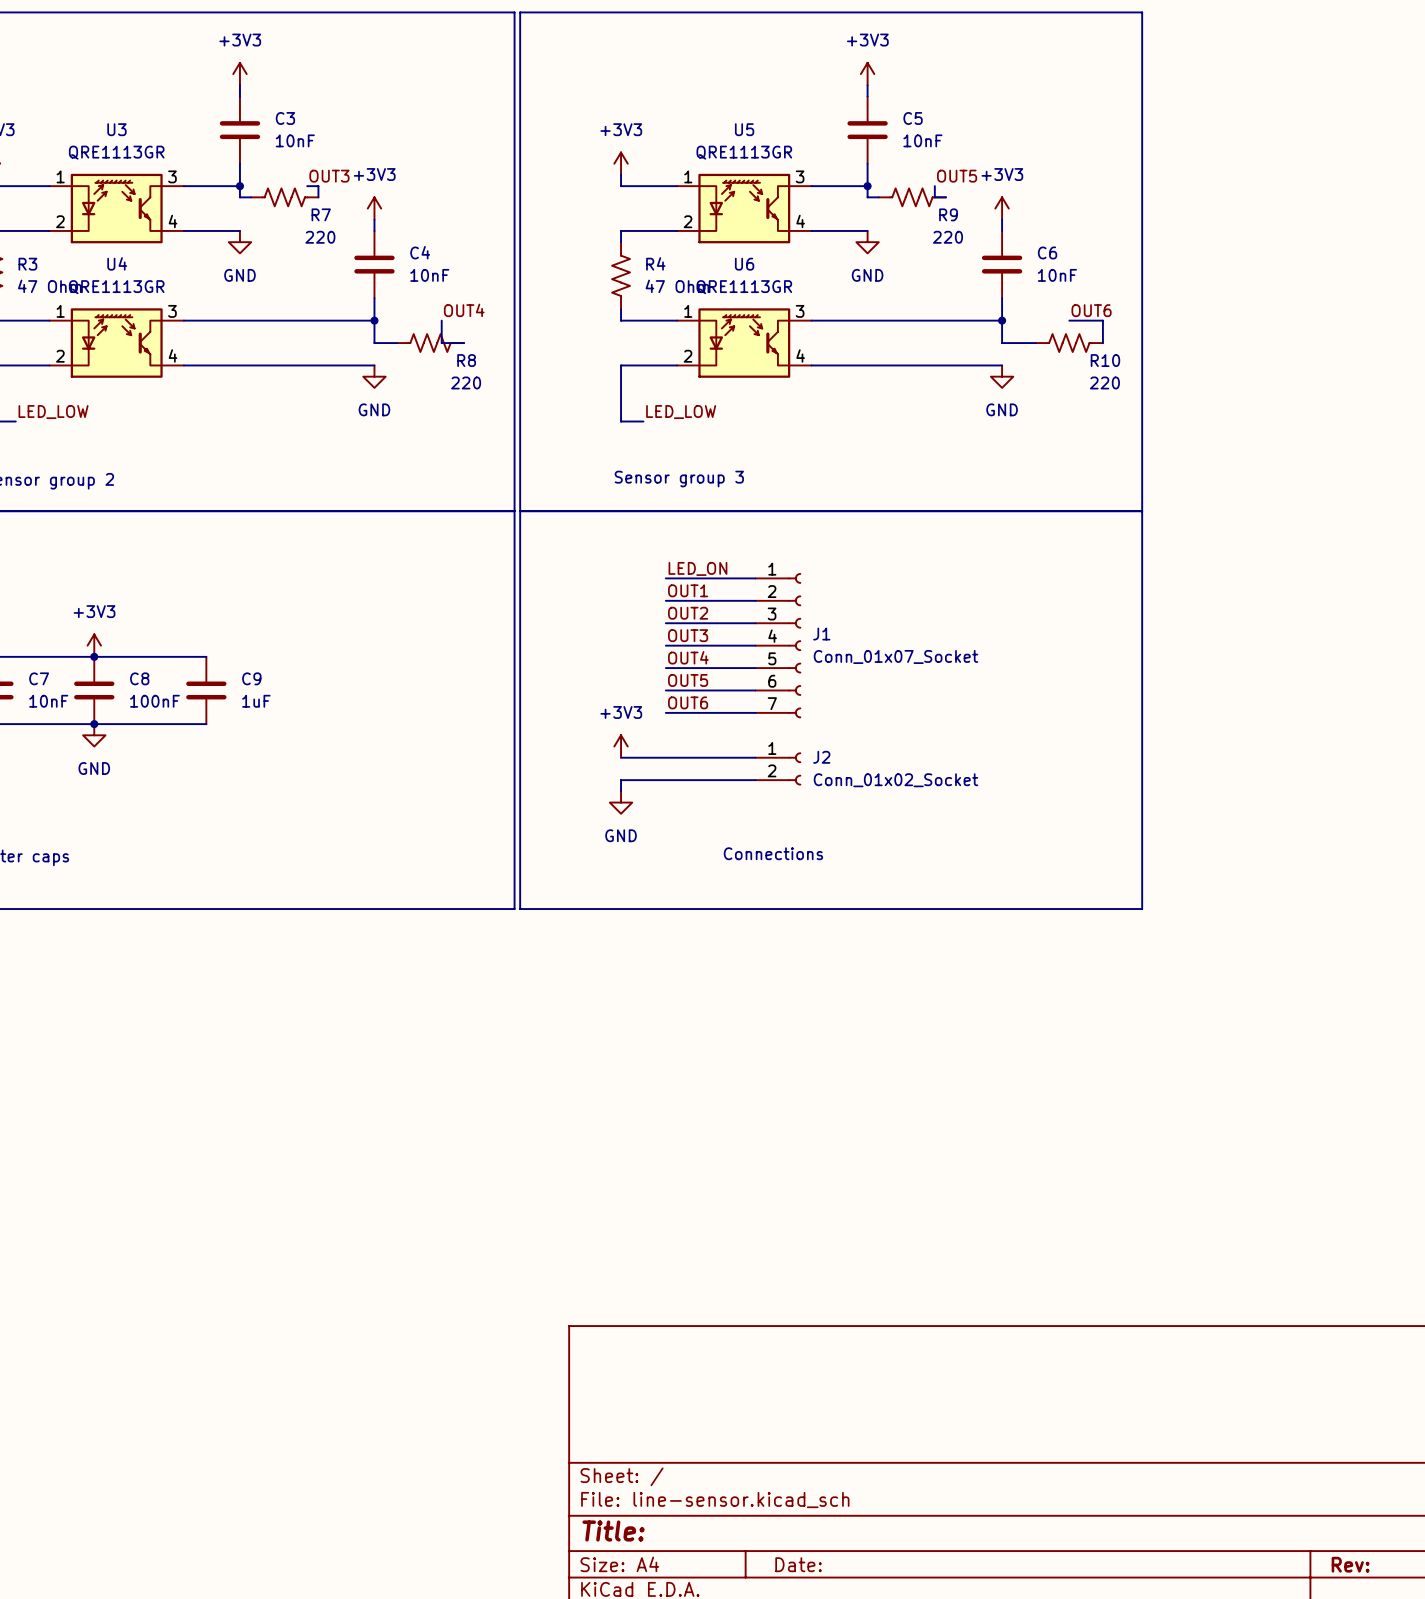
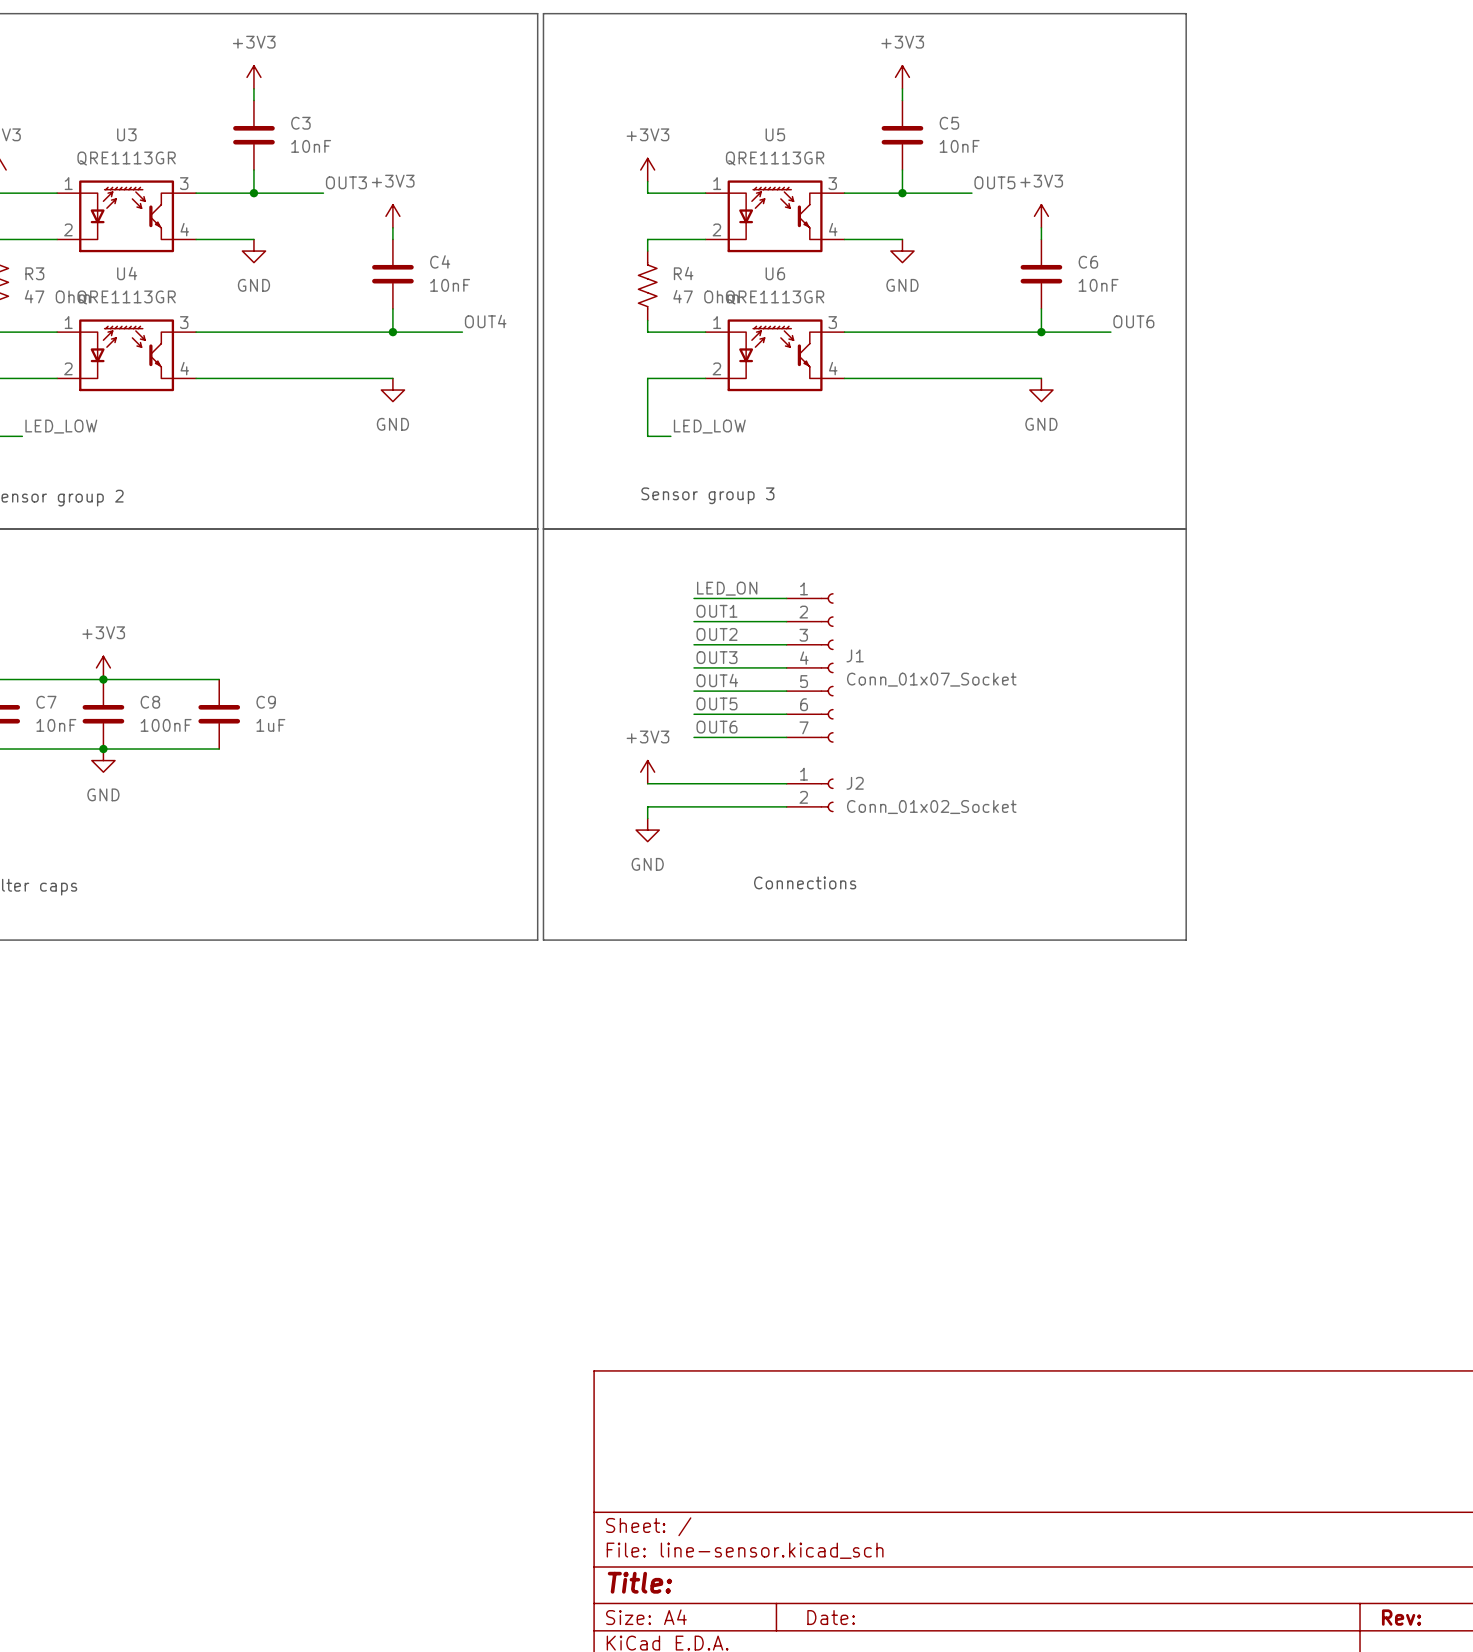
wire: (239, 186) (239, 197) (251, 197) -> (253, 193) (323, 193)
wire: (307, 186) (318, 186) (318, 197) -> none
wire: (867, 186) (867, 197) (878, 197) -> (902, 193) (971, 193)
wire: (934, 186) (934, 197) (946, 197) -> none
R7: 220 (284, 197) -> none
R9: 220 (912, 197) -> none
wire: (374, 320) (374, 343) (396, 343) -> (392, 332) (462, 332)
wire: (441, 320) (441, 343) (464, 343) -> none
wire: (1002, 320) (1002, 343) (1035, 343) -> (1041, 332) (1110, 332)
wire: (1069, 320) (1102, 320) (1102, 343) -> none
R8: 220 (430, 343) -> none
R10: 220 (1069, 343) -> none

